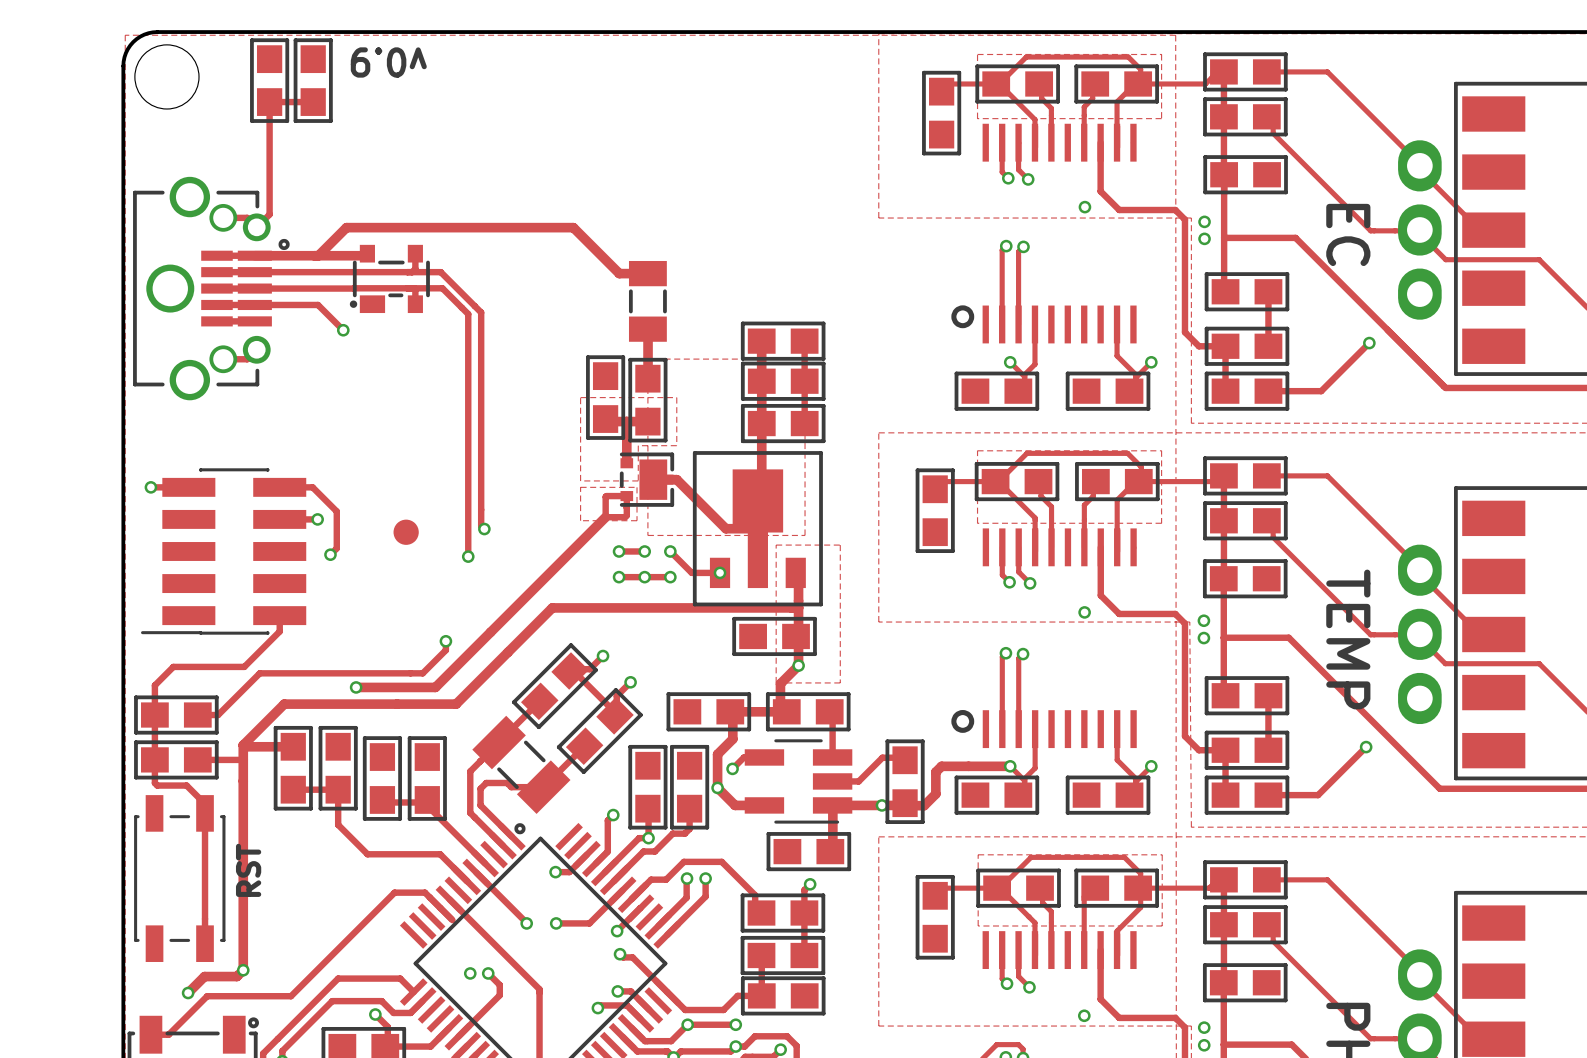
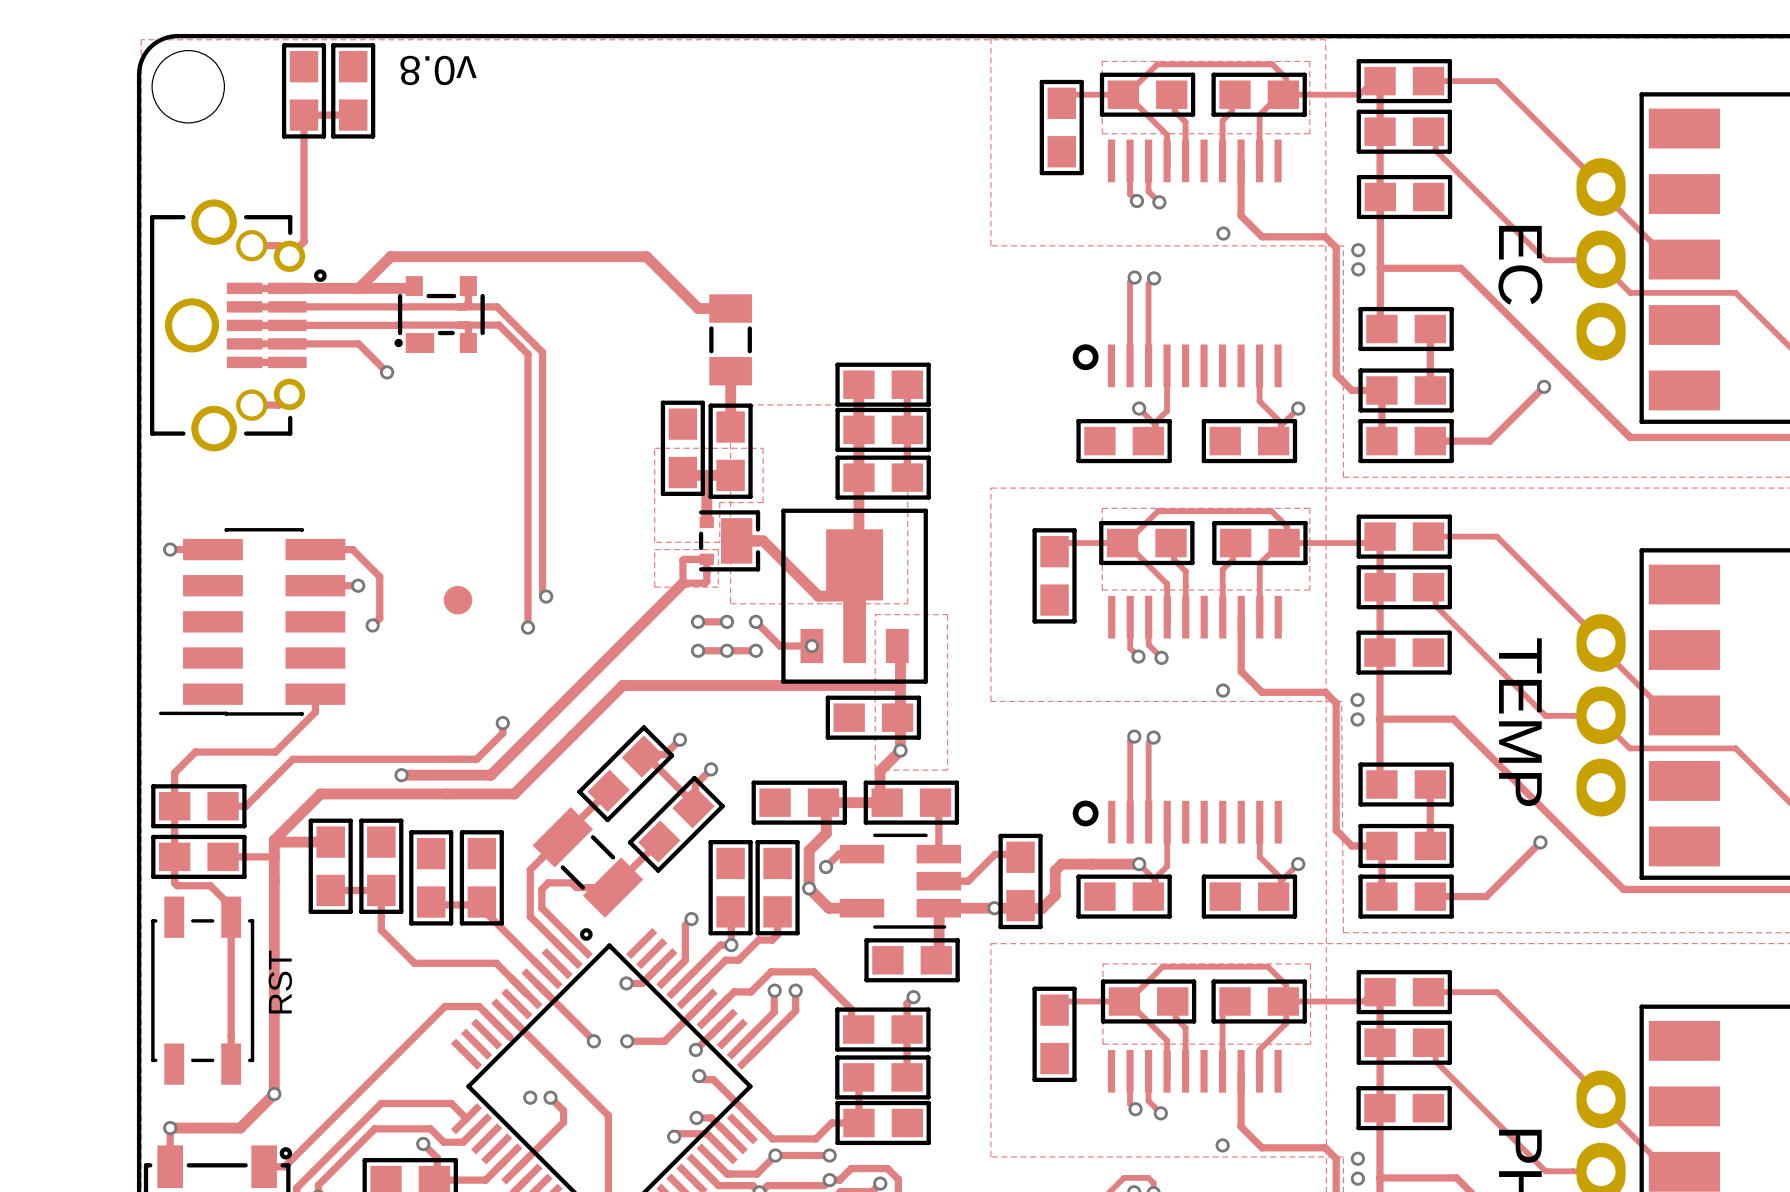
text: v0.9 (388, 62) -> v0.8 (438, 70)
track: (236, 976) (204, 976) (188, 993) -> (267, 1101) (240, 1128) (170, 1128) (170, 1158)
via position: (188, 993) -> (170, 1128)
track: (291, 996) (207, 996) (168, 1034) (150, 1034) -> (328, 1123) (284, 1166) (264, 1166)

